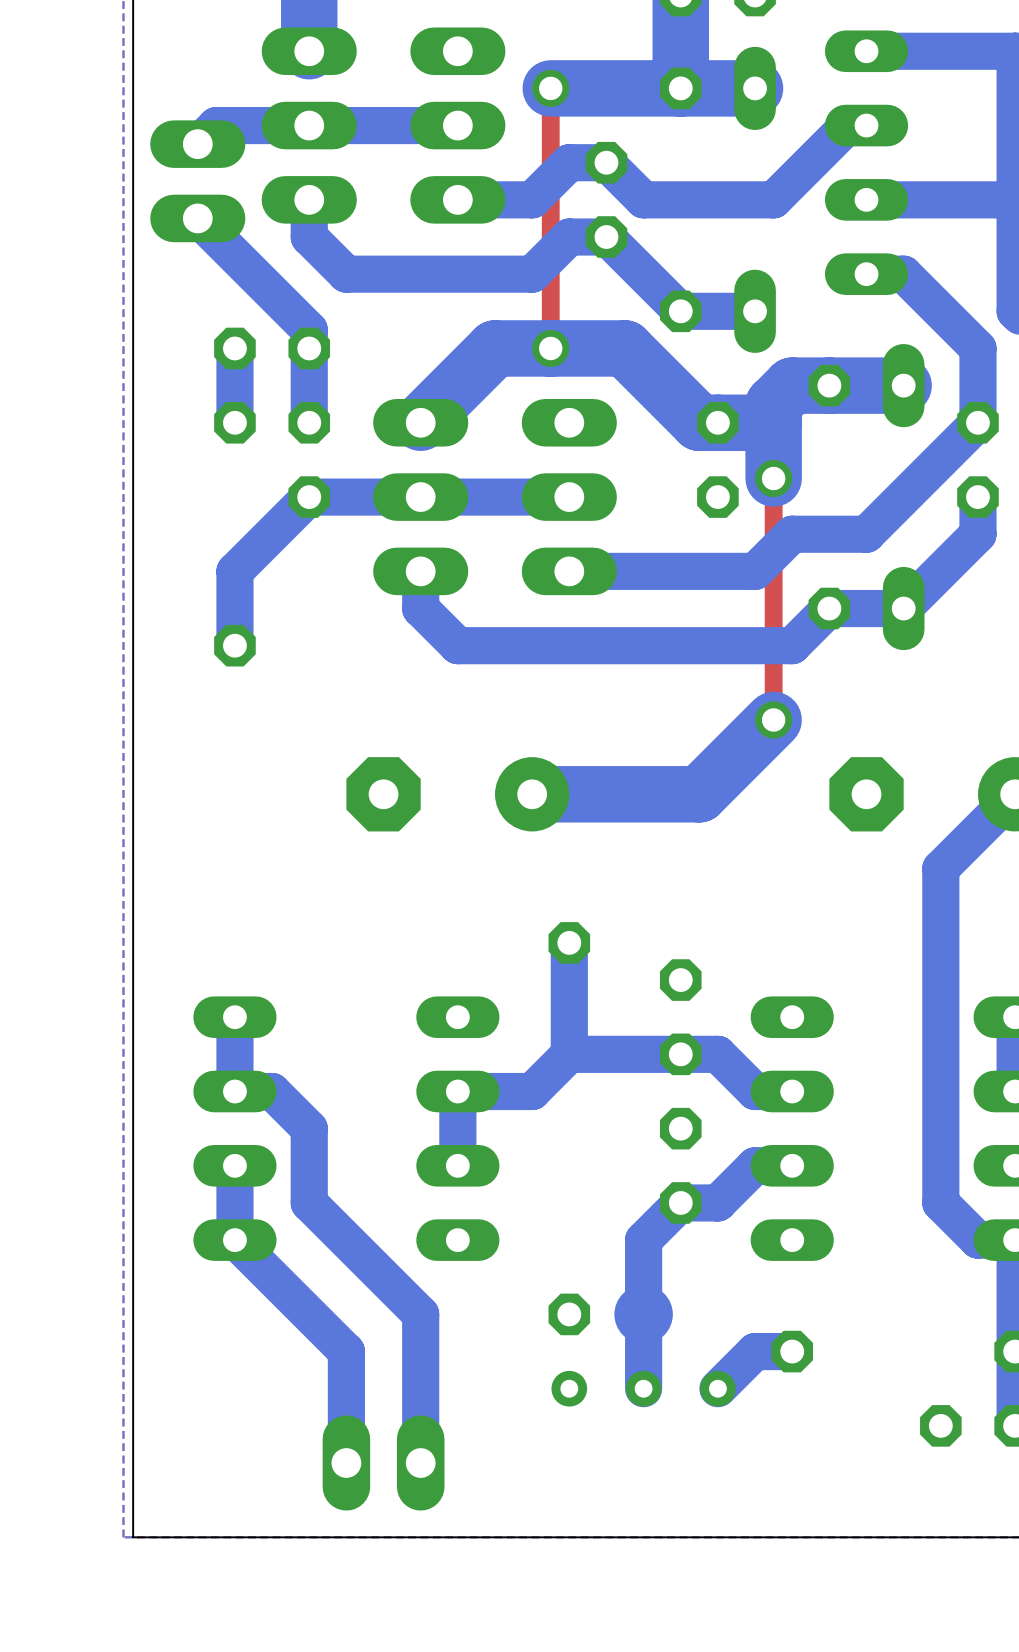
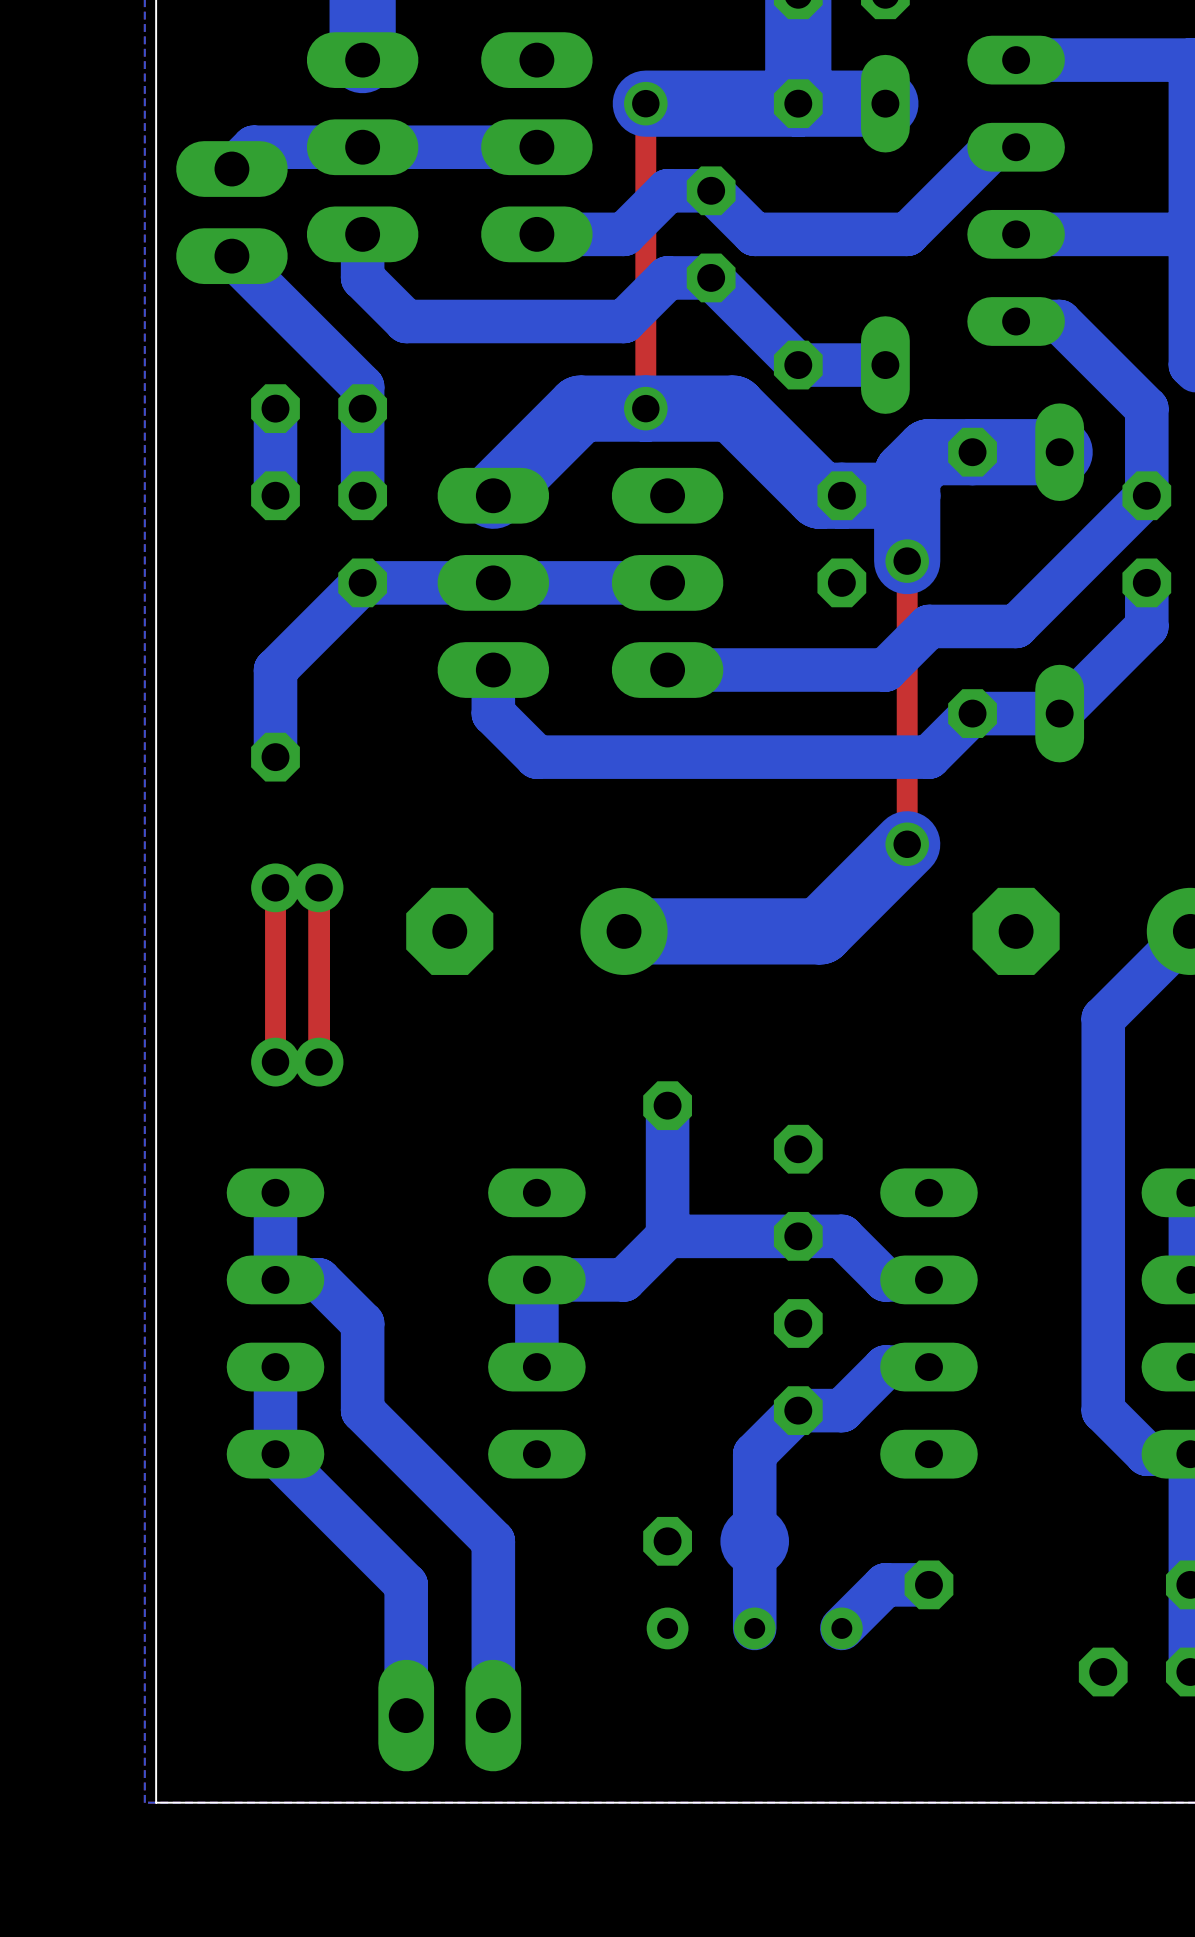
top track: none -> (275, 887) (275, 1062)
via: none -> (275, 887)
top track: none -> (319, 887) (319, 1062)
via: none -> (319, 887)
via: none -> (275, 1062)
via: none -> (319, 1062)

